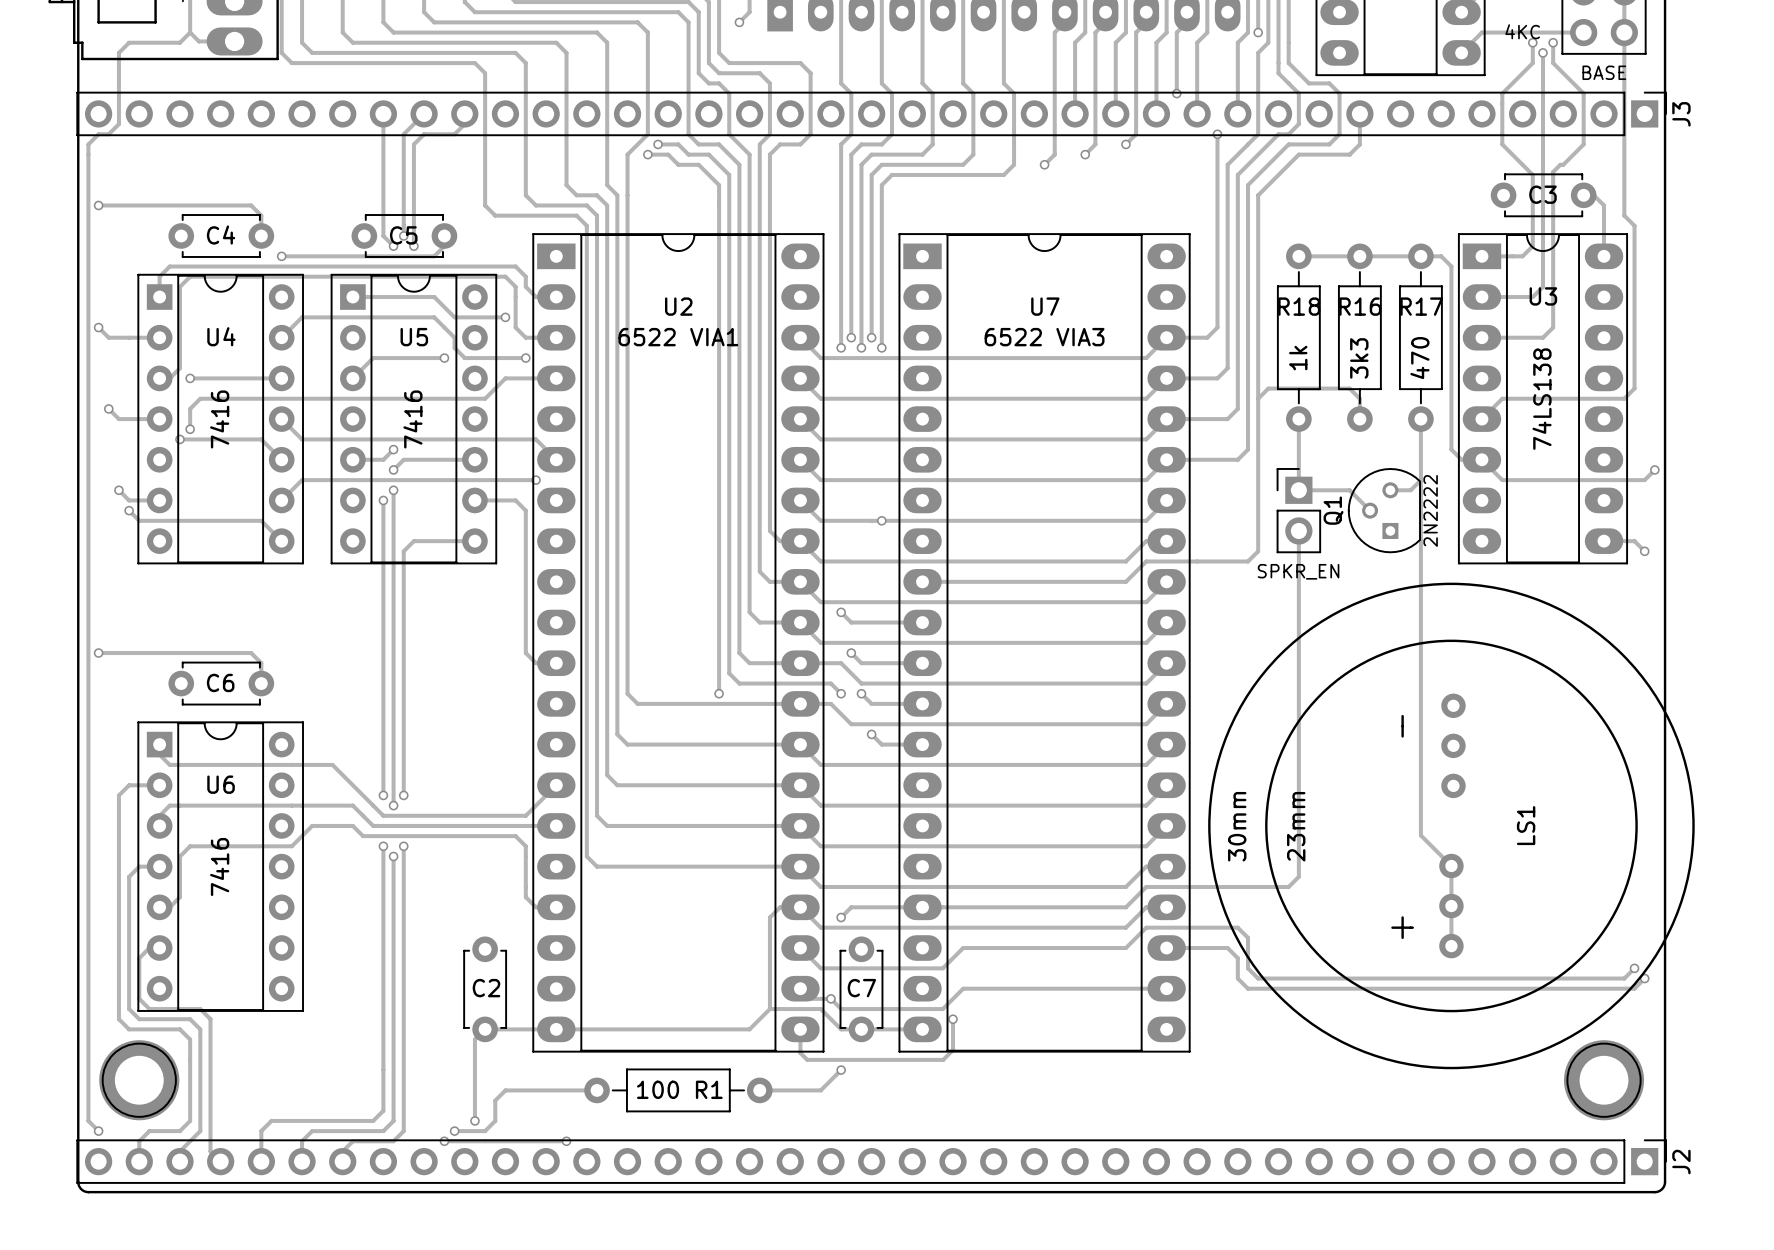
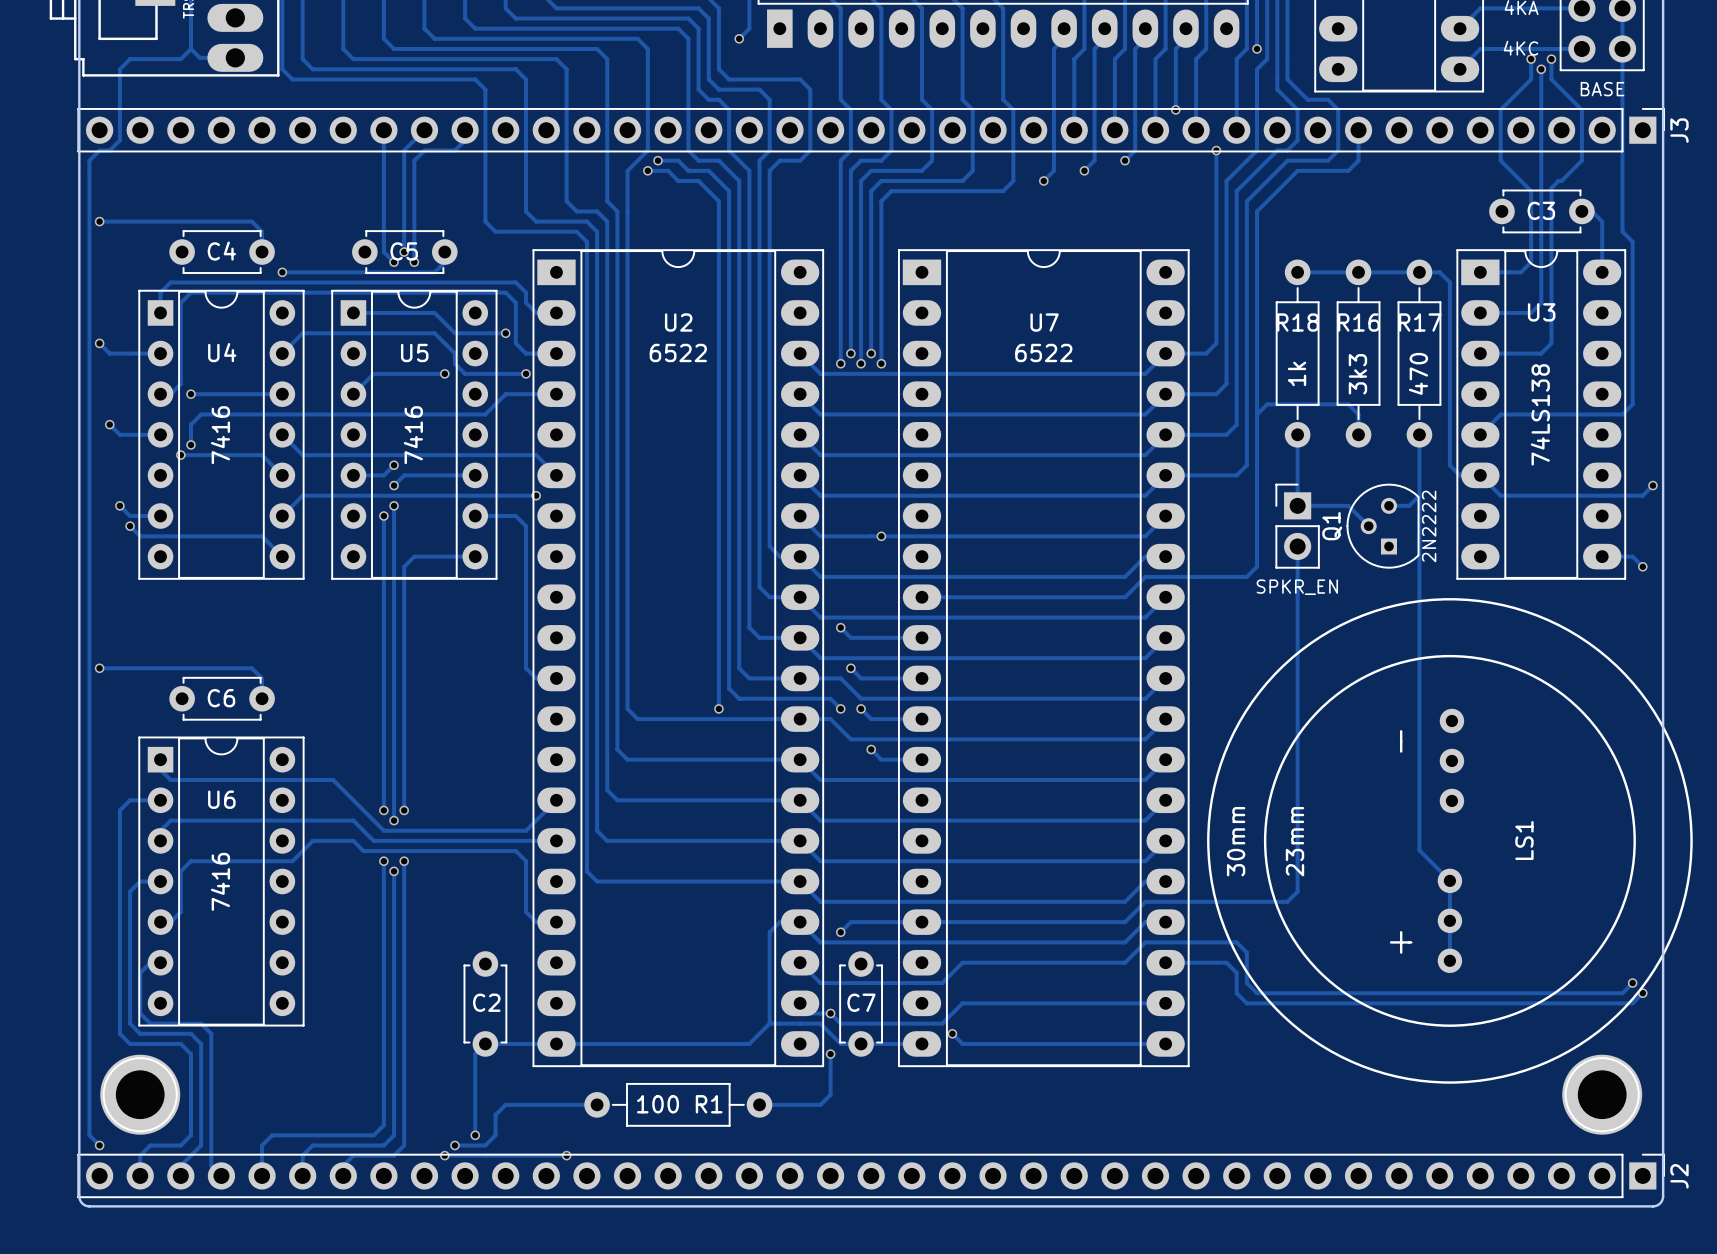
U2 value: 6522 VIA1 (678, 337) -> 6522 (678, 352)
U7 value: 6522 VIA3 (1044, 337) -> 6522 (1043, 352)
track: (953, 1019) (953, 1050) (943, 1059) (807, 1059) (800, 1053) (800, 1029) -> (952, 1033) (962, 1043) (1165, 1043)
track: (841, 1070) (830, 1080) -> (830, 1054) (830, 1094)
via position: (841, 1070) -> (830, 1054)

